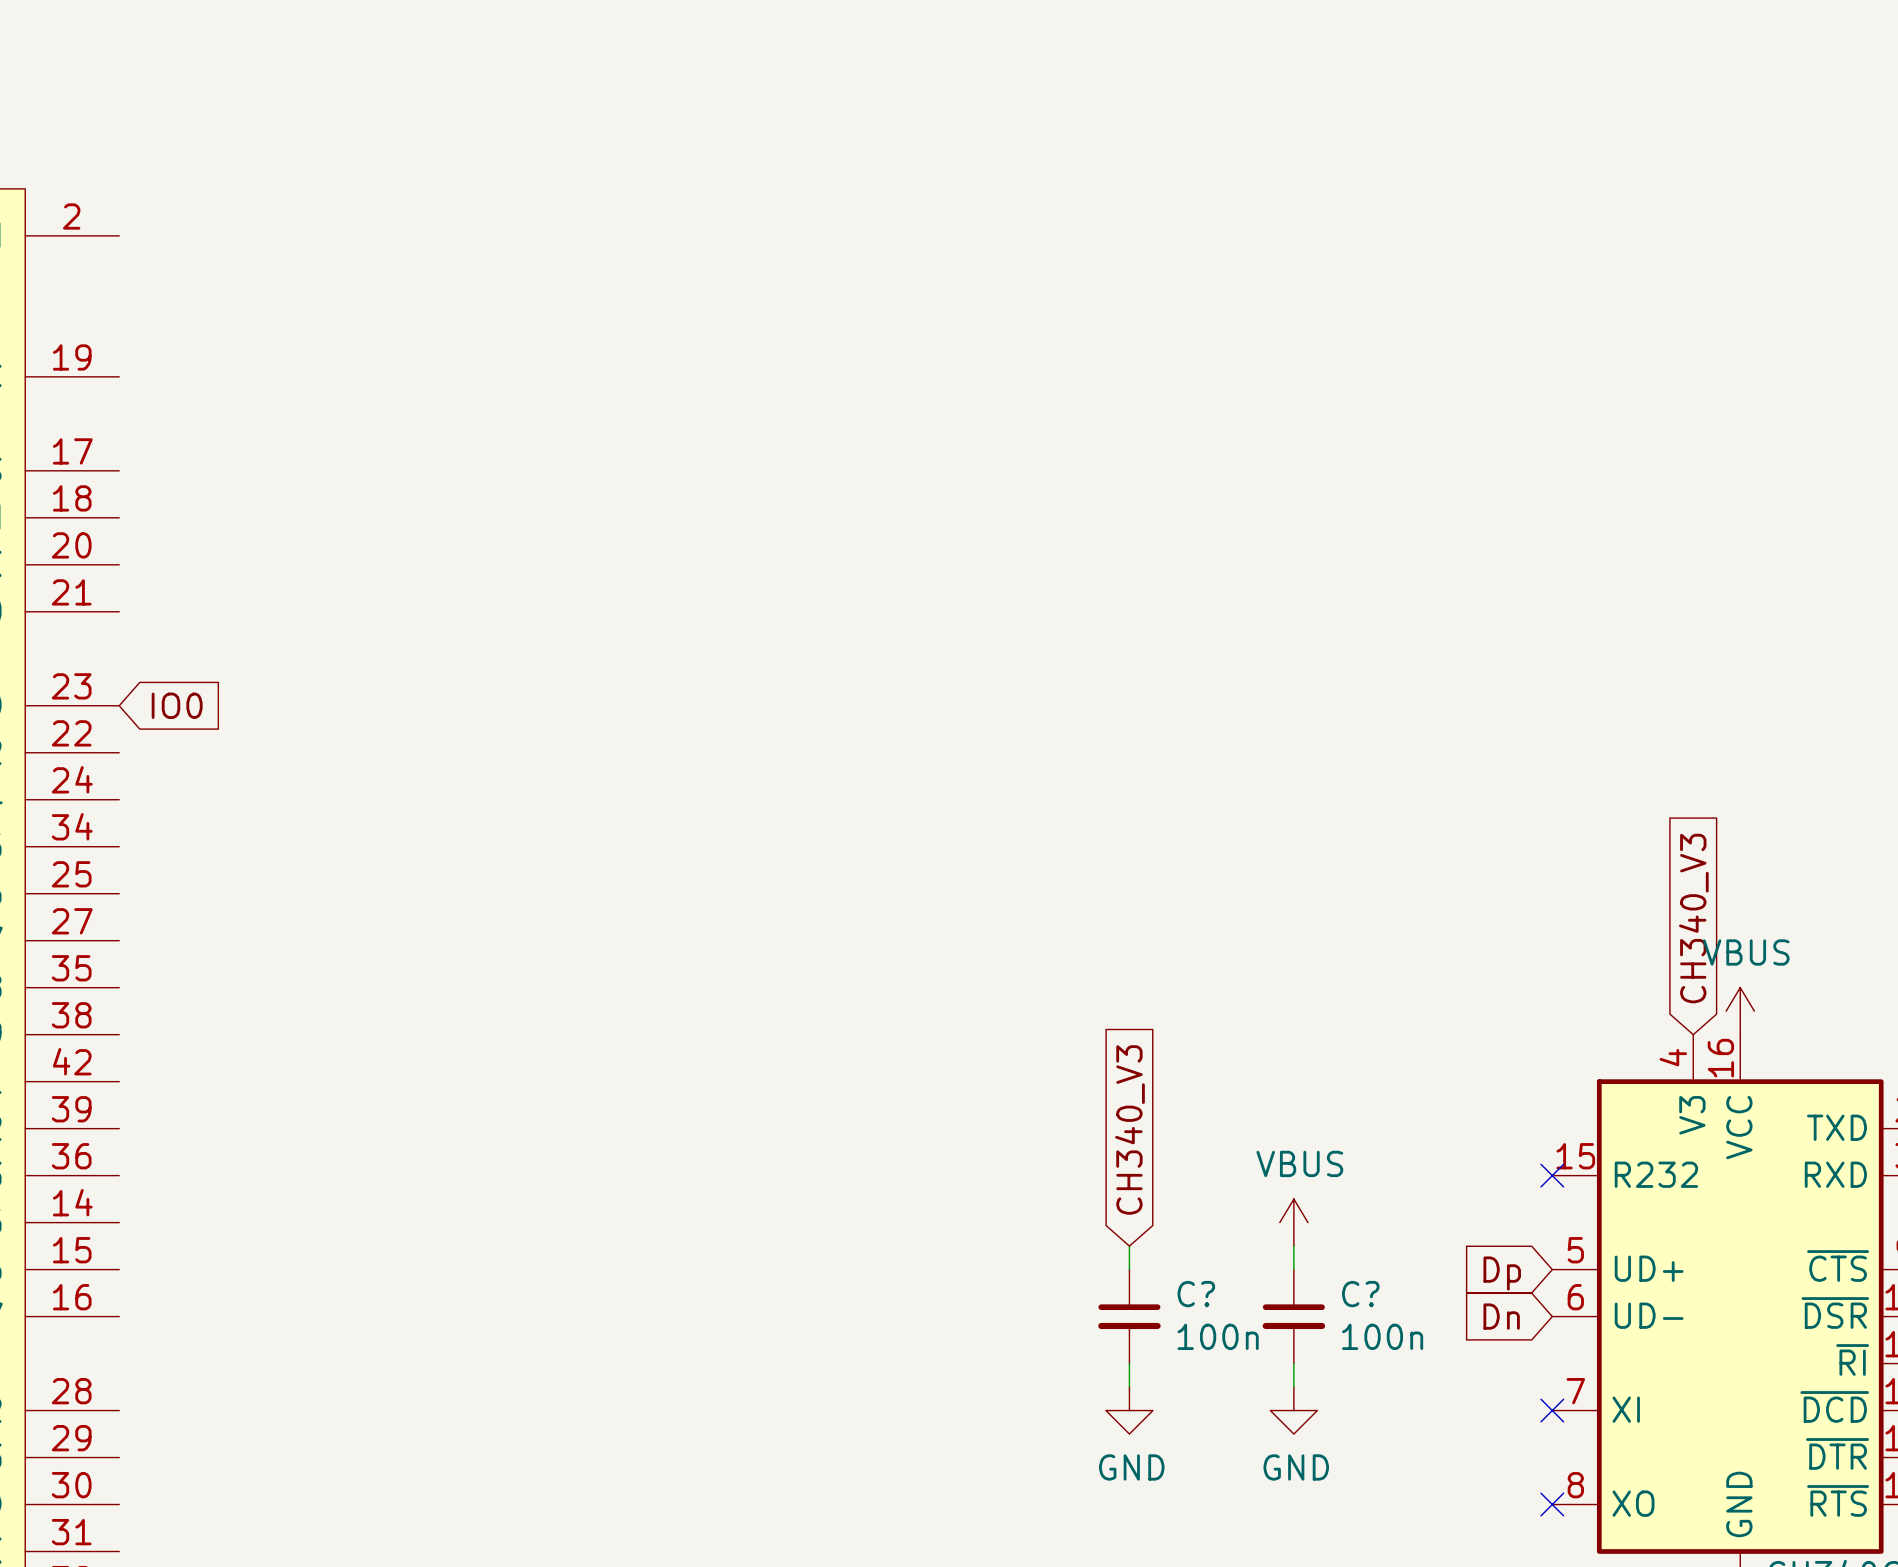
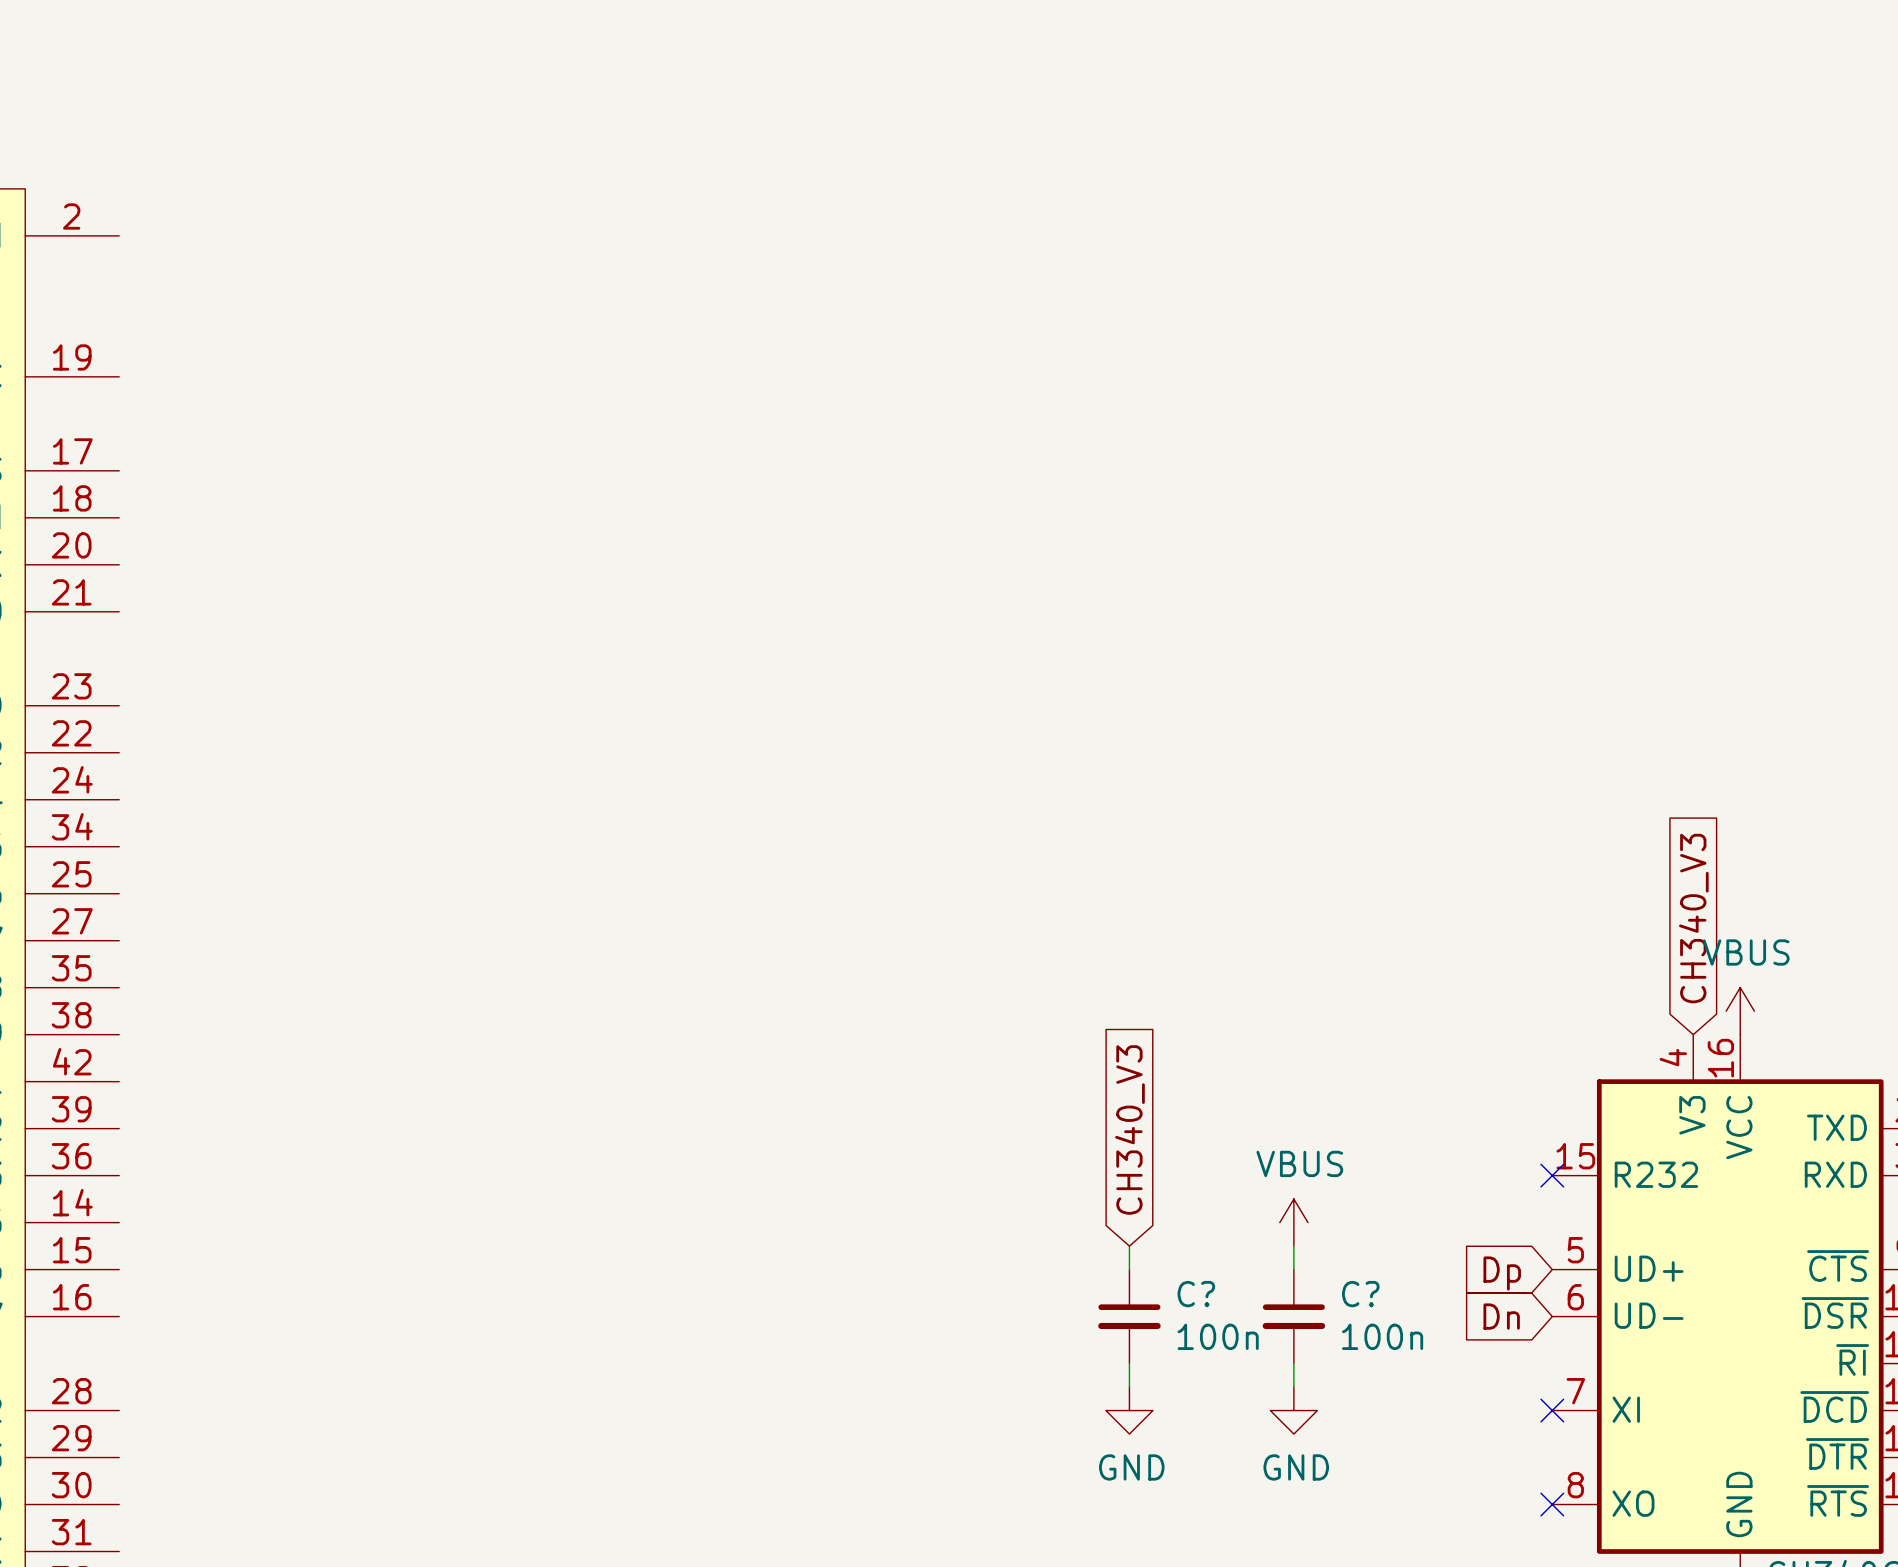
global label: IO0 (177, 705) -> none

